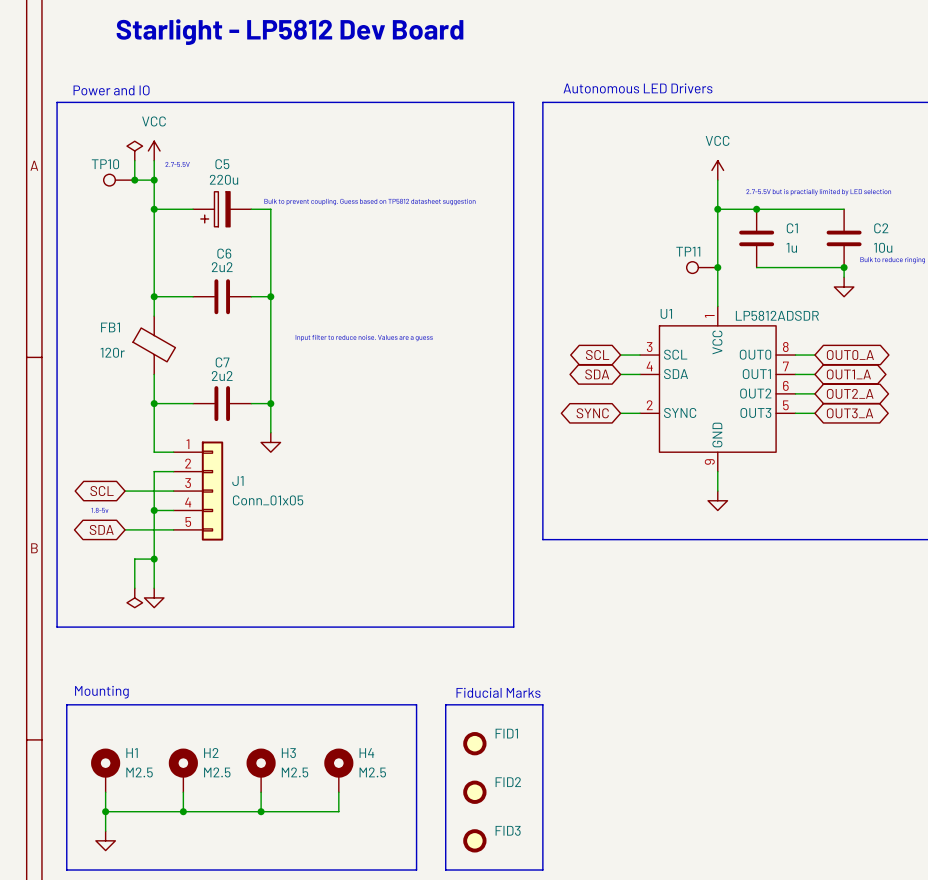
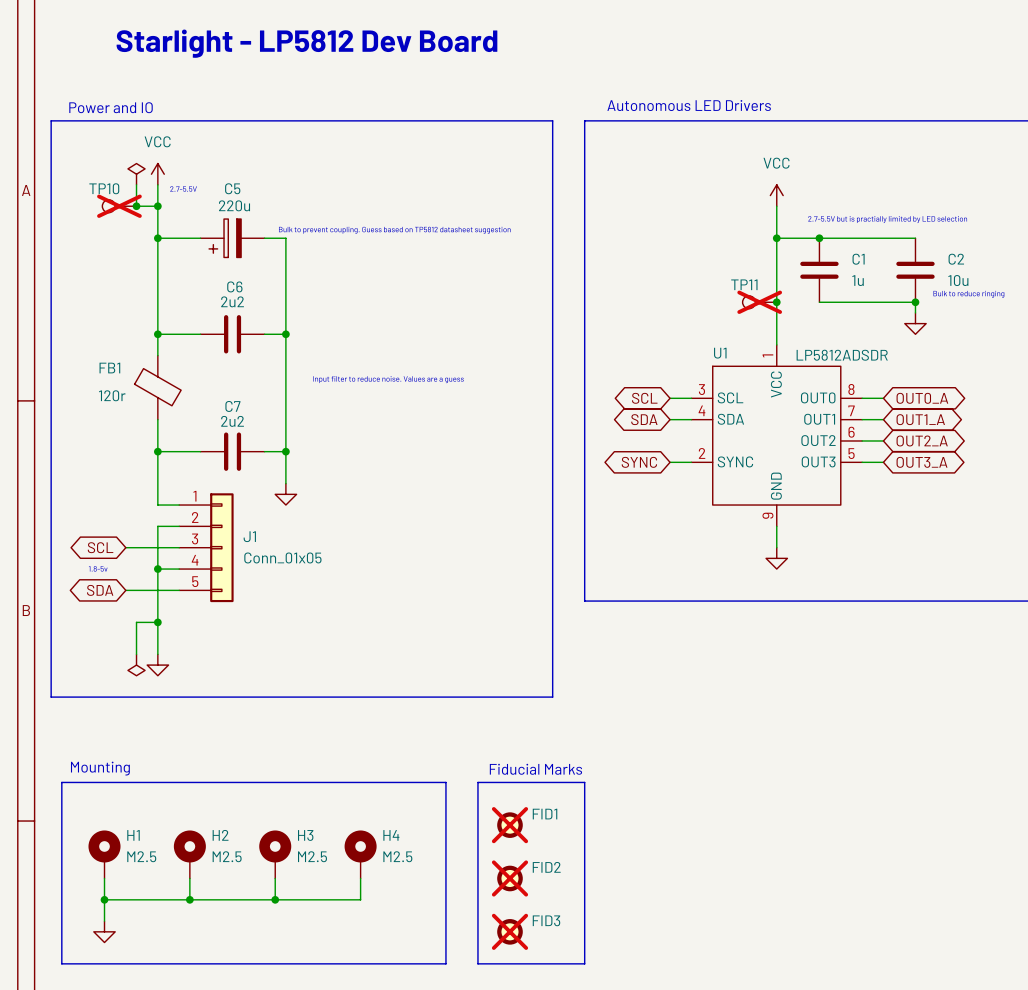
TP10 do-not-place cross: none -> (119, 206)
TP11 do-not-place cross: none -> (759, 302)
FID1 do-not-place cross: none -> (509, 825)
FID2 do-not-place cross: none -> (509, 878)
FID3 do-not-place cross: none -> (509, 931)

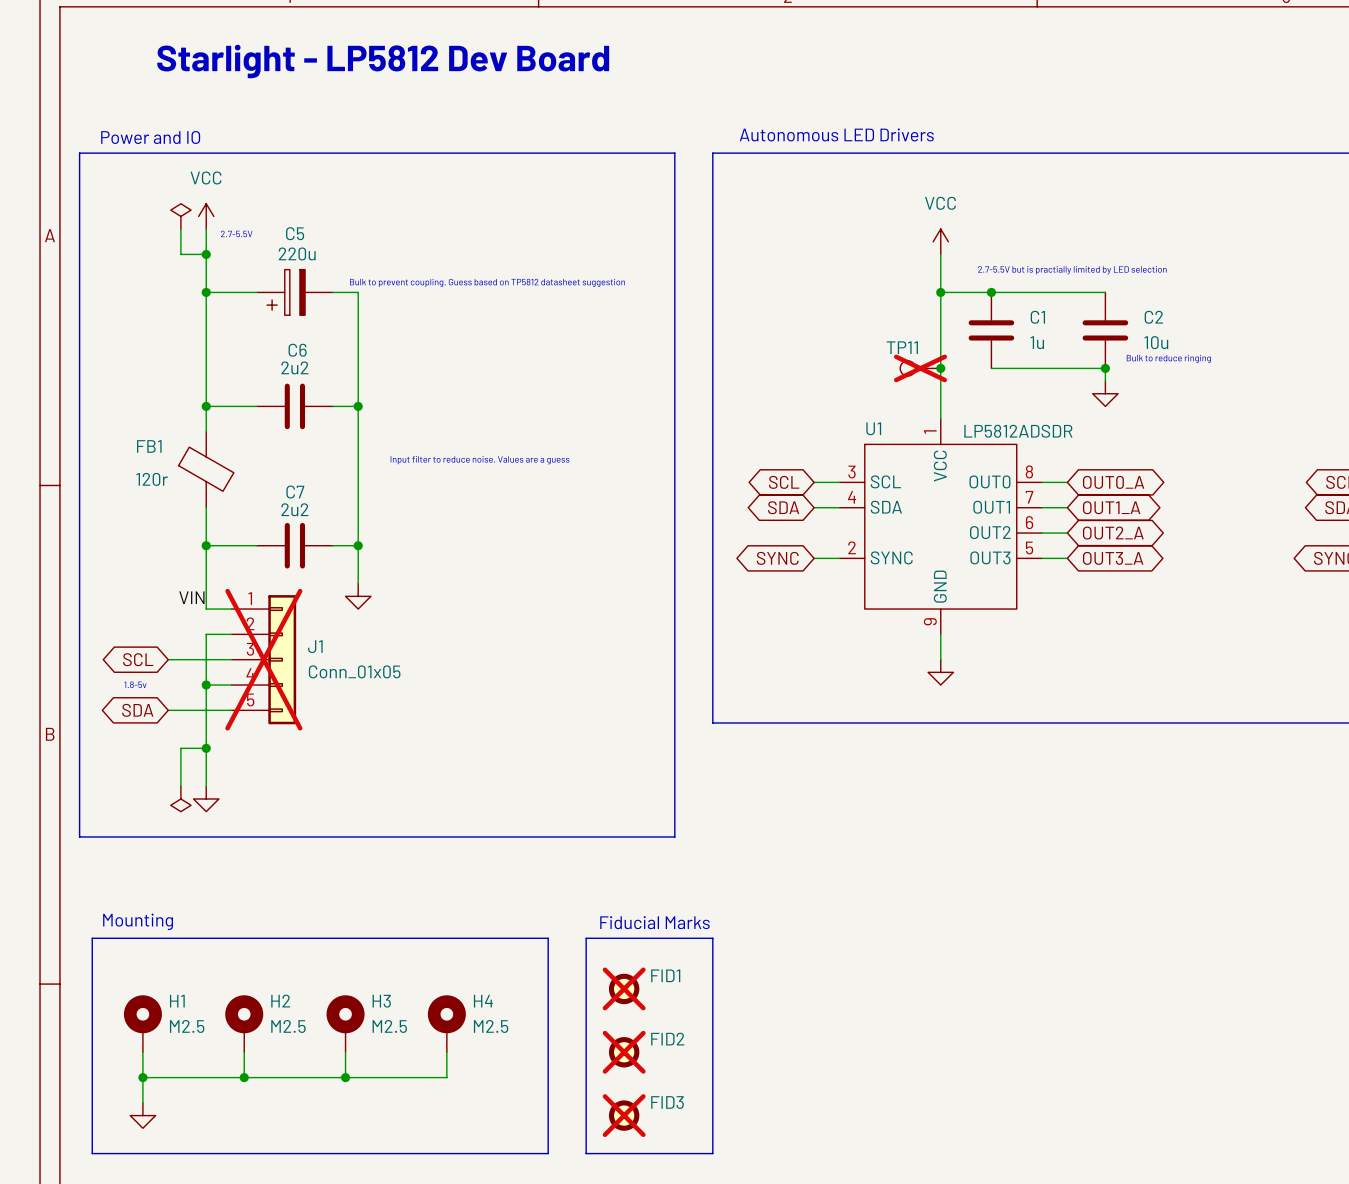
TP10: (119, 206) -> none
junction: (136, 206) -> none
label: none -> VIN (191, 597)
J1 do-not-place cross: none -> (263, 659)

